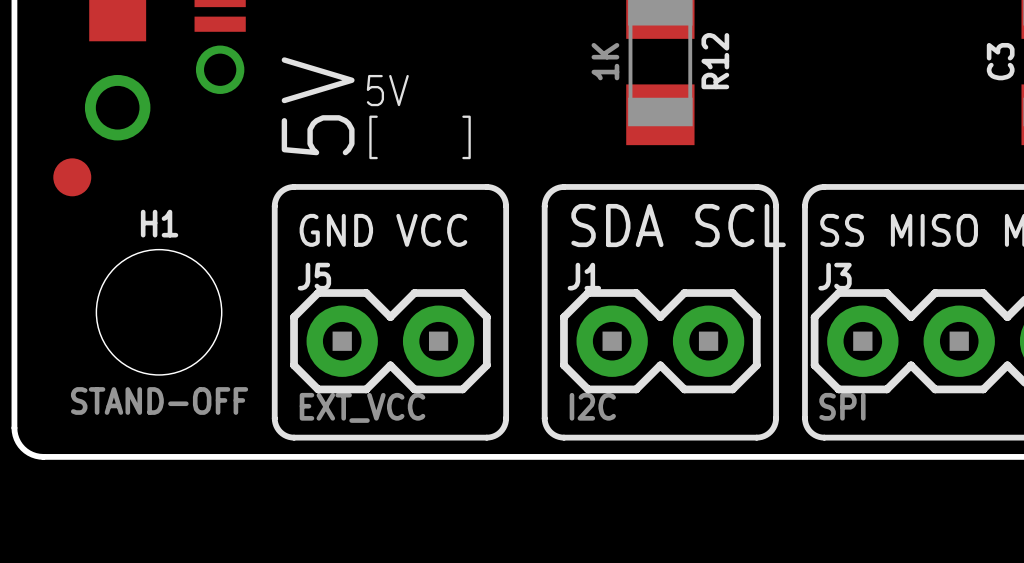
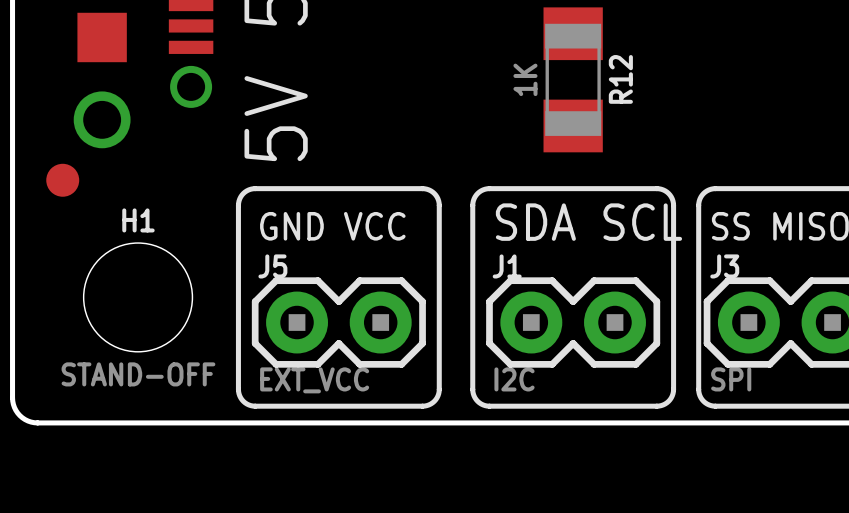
text: 5V (387, 90) -> none
text: [ ] (420, 137) -> none

